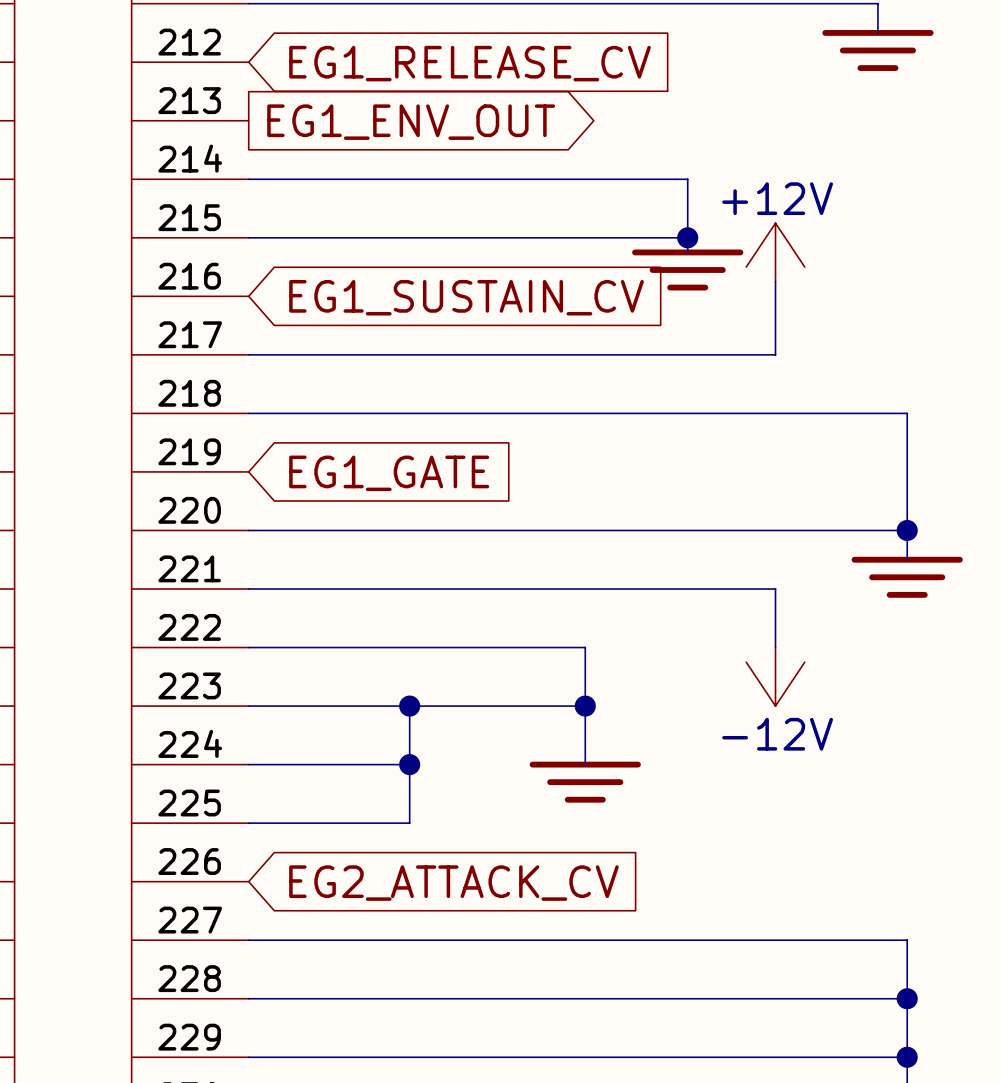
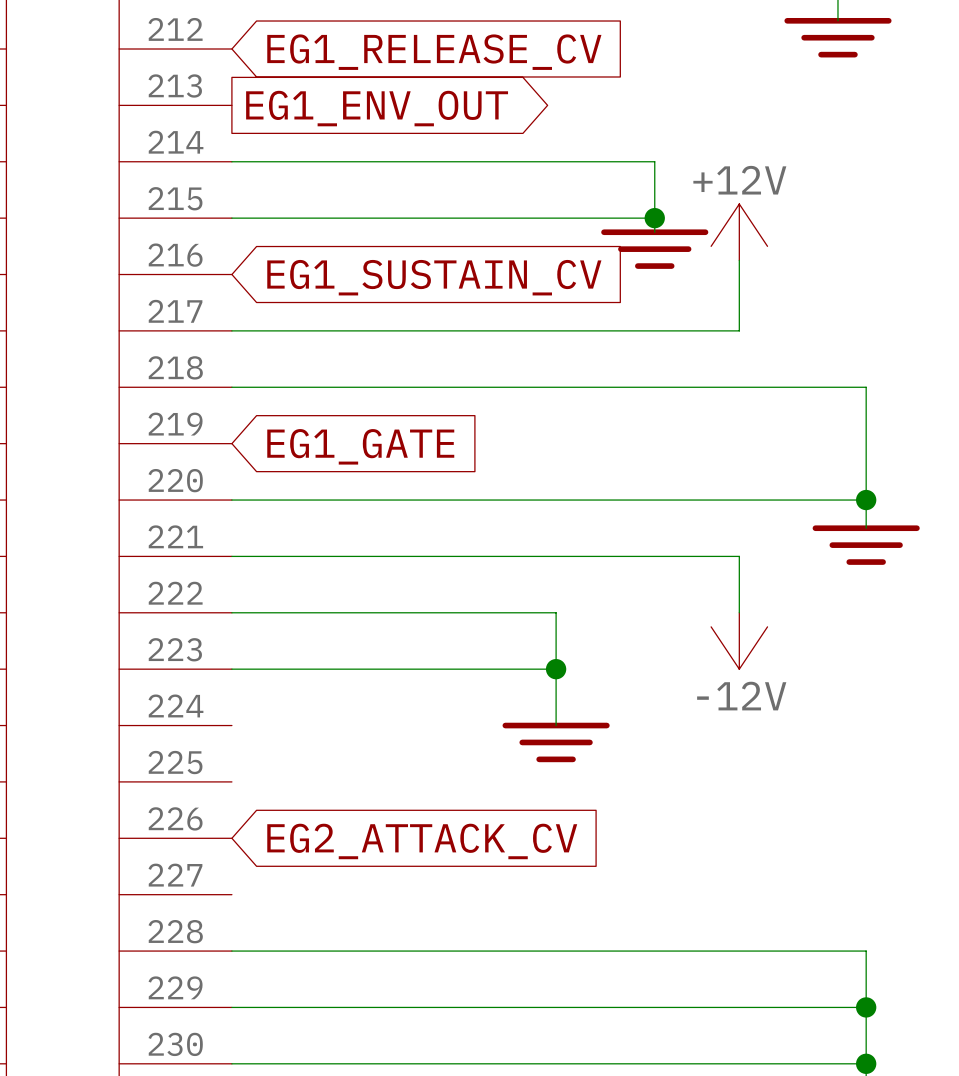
wire: (409, 706) (409, 823) (248, 823) -> none
junction: (409, 706) -> none
wire: (248, 764) (409, 764) -> none
junction: (409, 764) -> none
wire: (248, 940) (907, 940) (907, 998) -> none
junction: (907, 998) -> none

